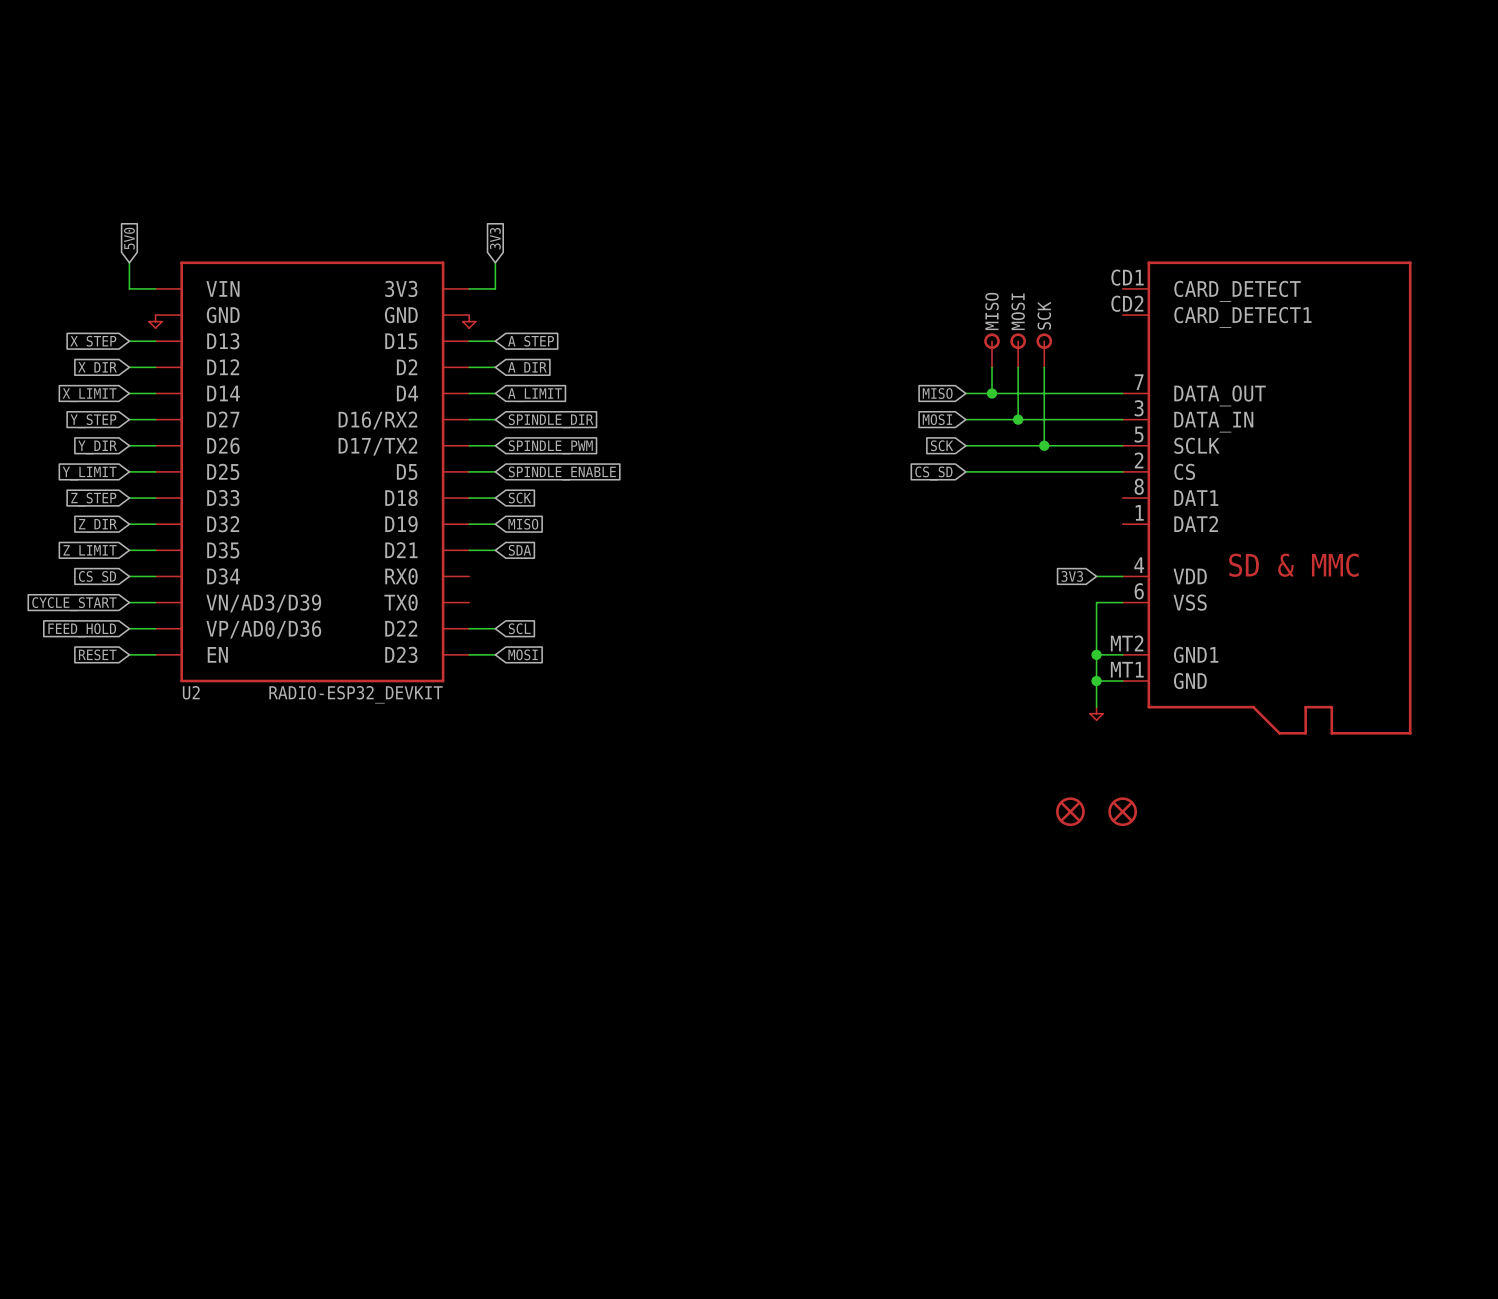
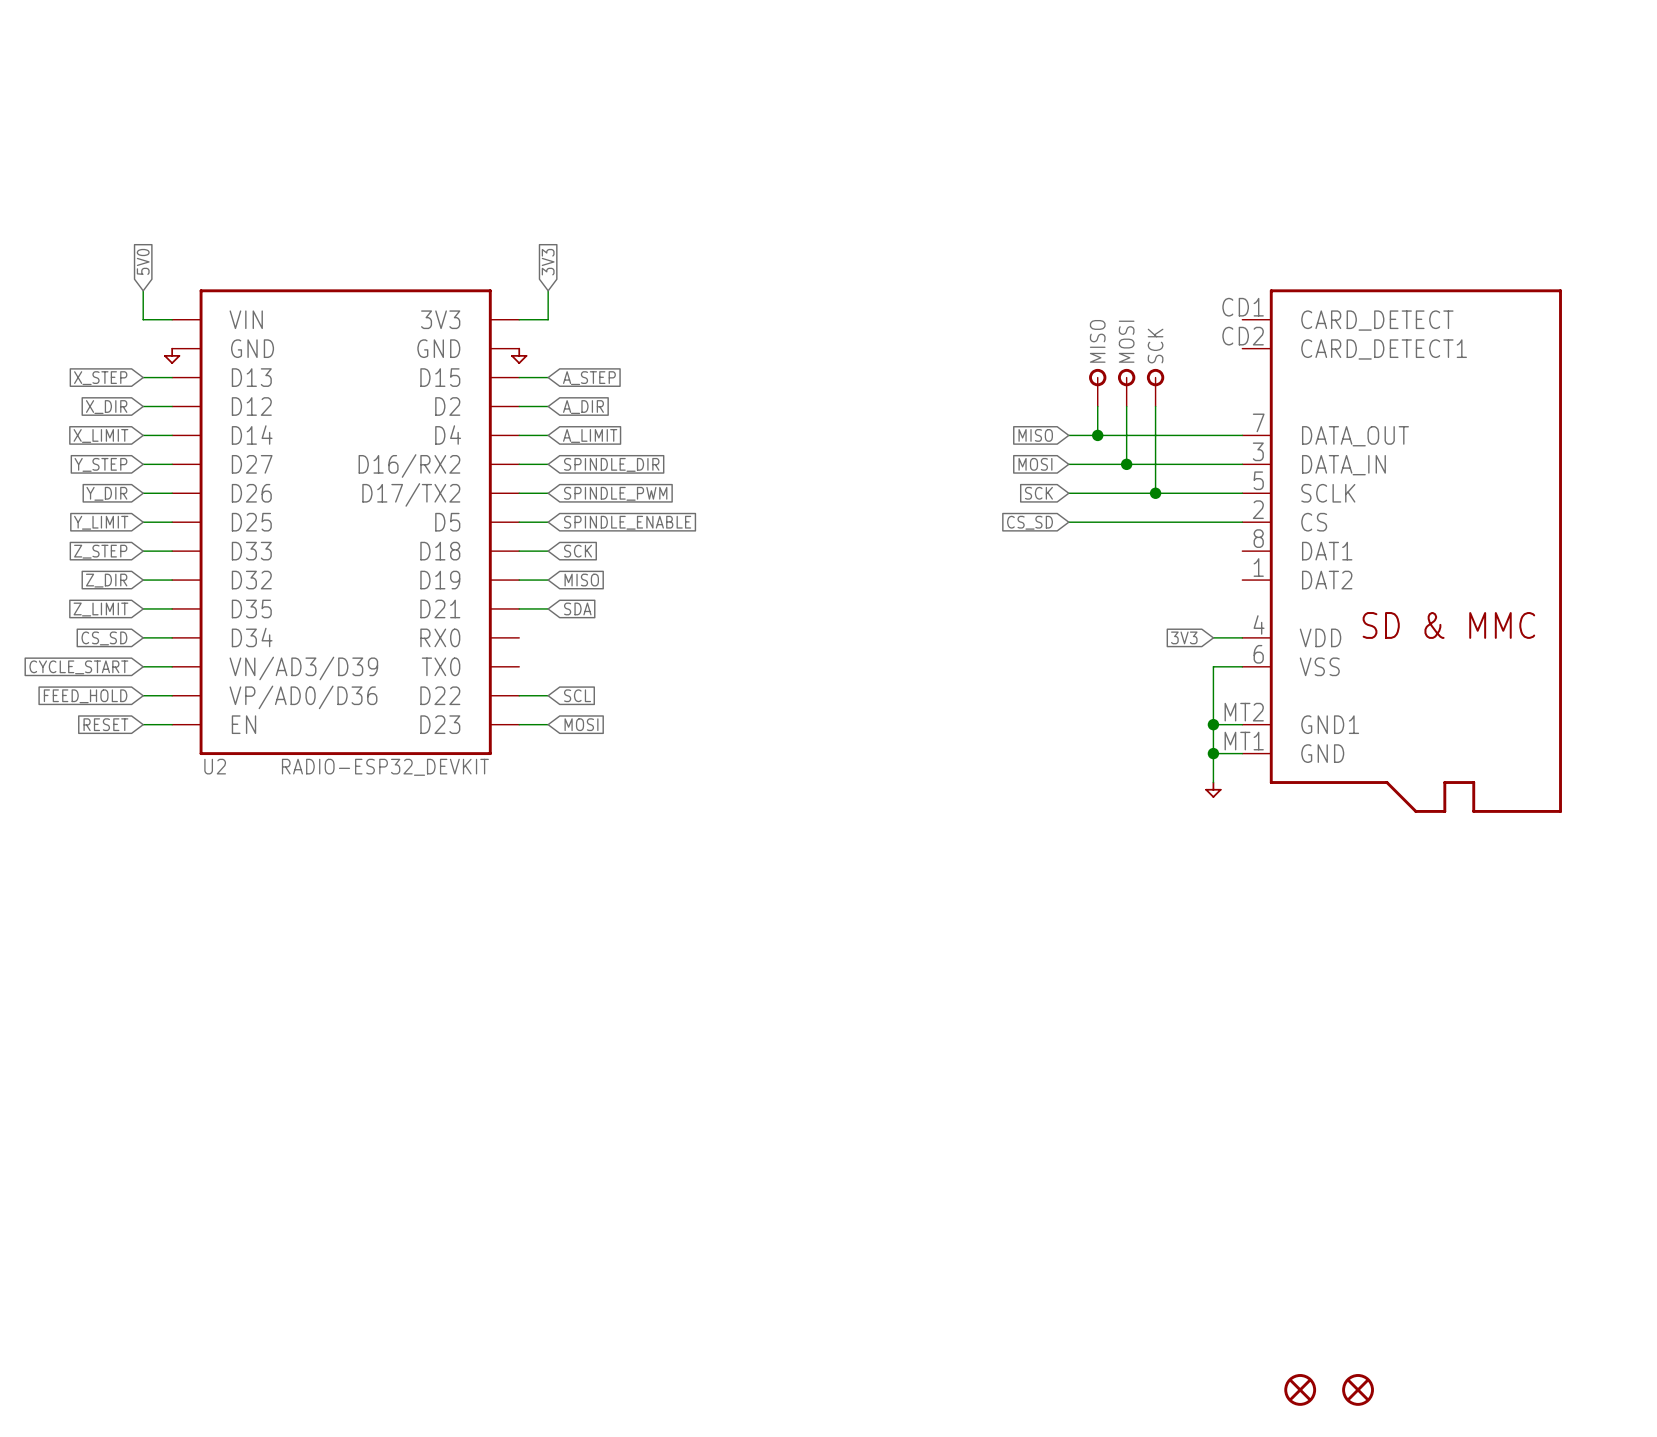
part: (1070, 811) -> none
part: (1122, 811) -> none
part: none -> (1300, 1389)
part: none -> (1358, 1389)

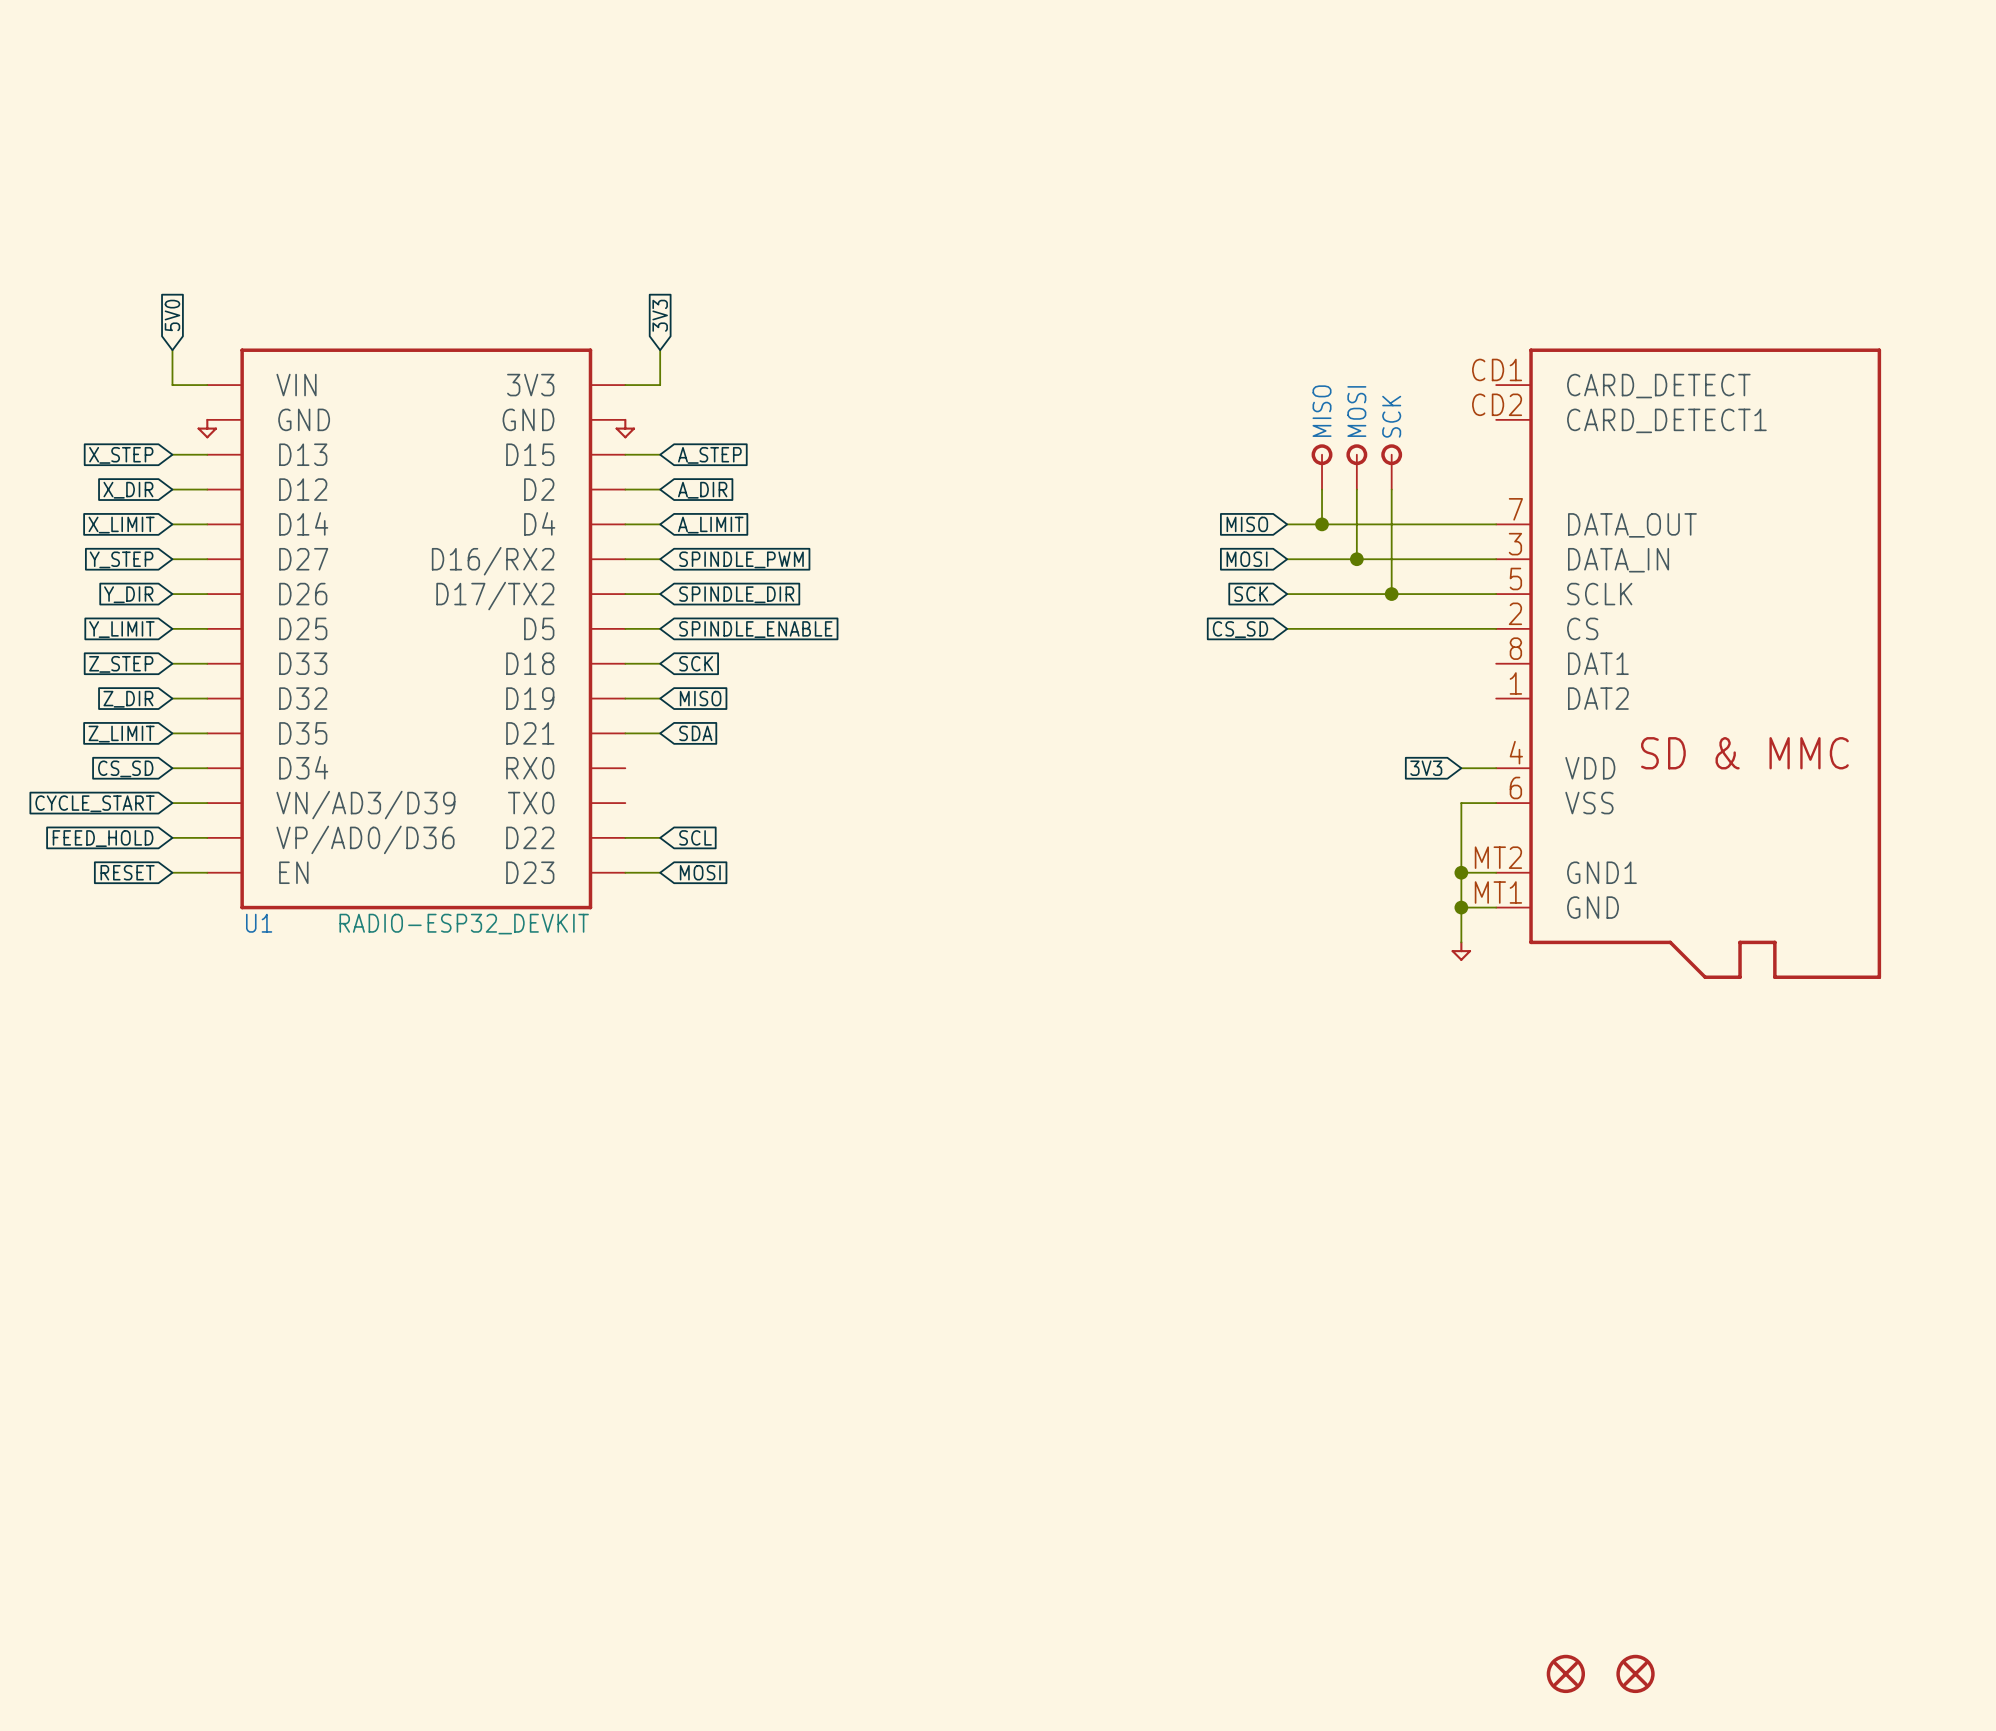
global label: SPINDLE_DIR (611, 464) -> SPINDLE_PWM (741, 559)
global label: SPINDLE_PWM (615, 493) -> SPINDLE_DIR (736, 594)
U2 name: U2 (215, 766) -> U1 (259, 923)

